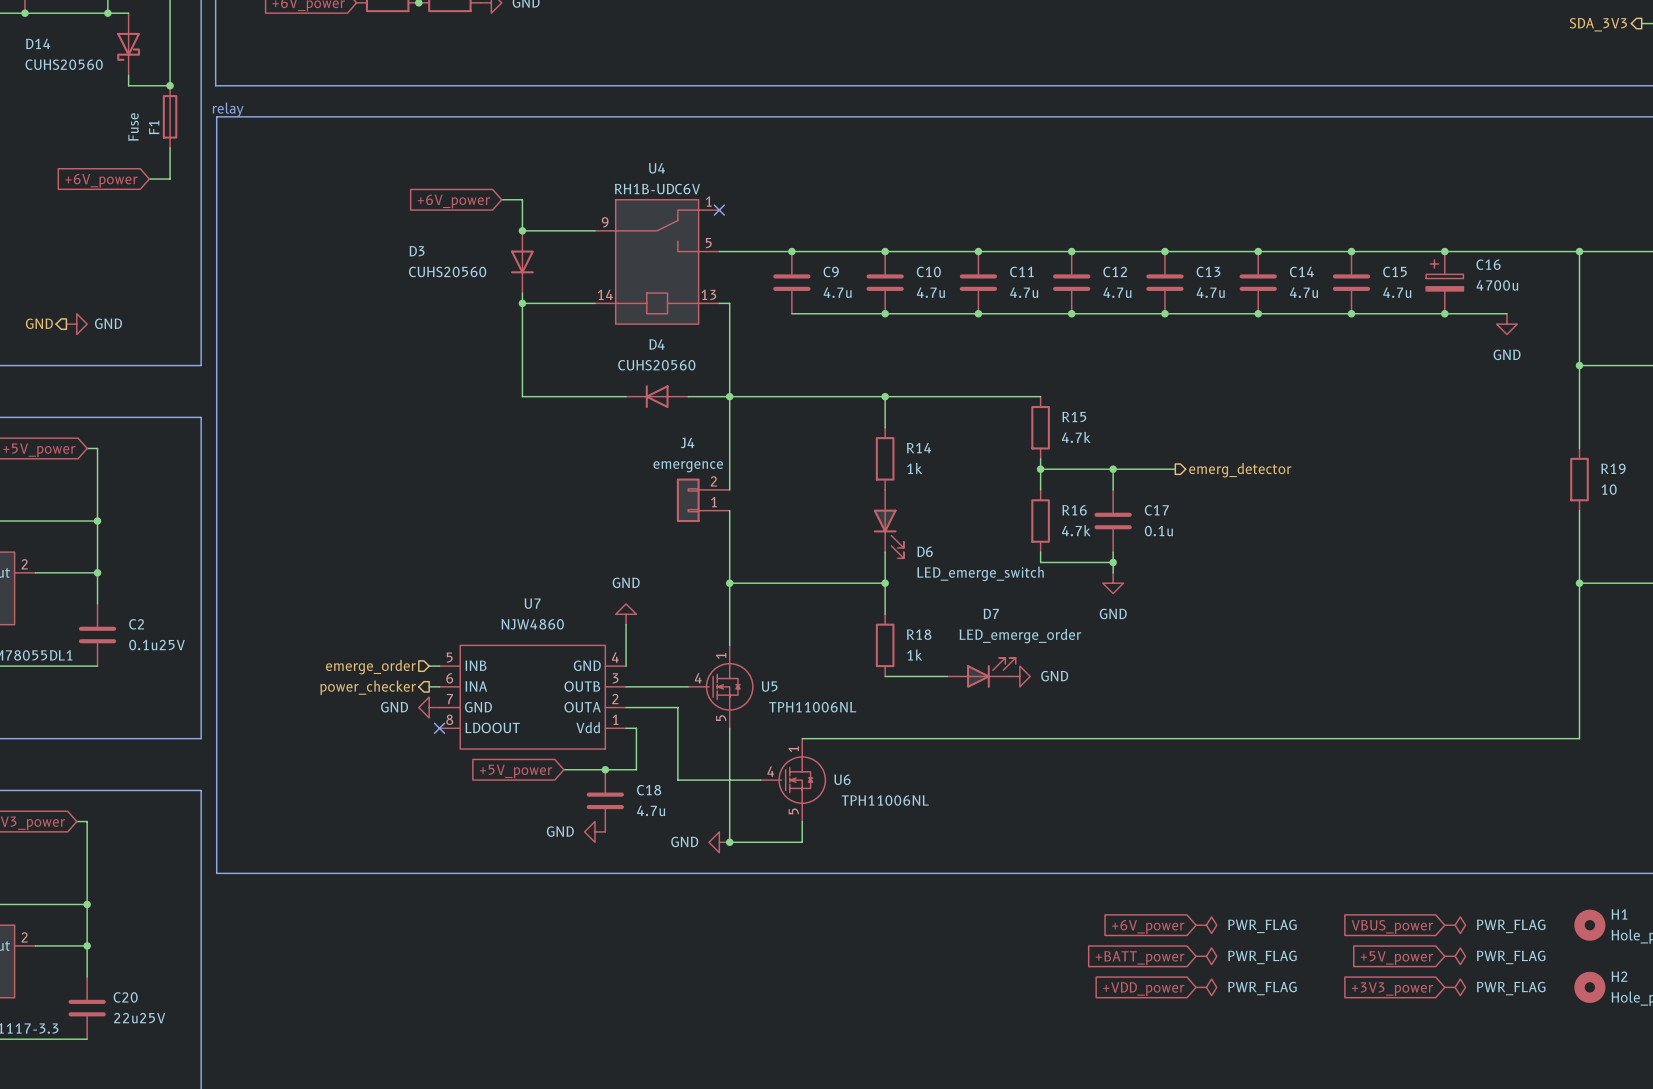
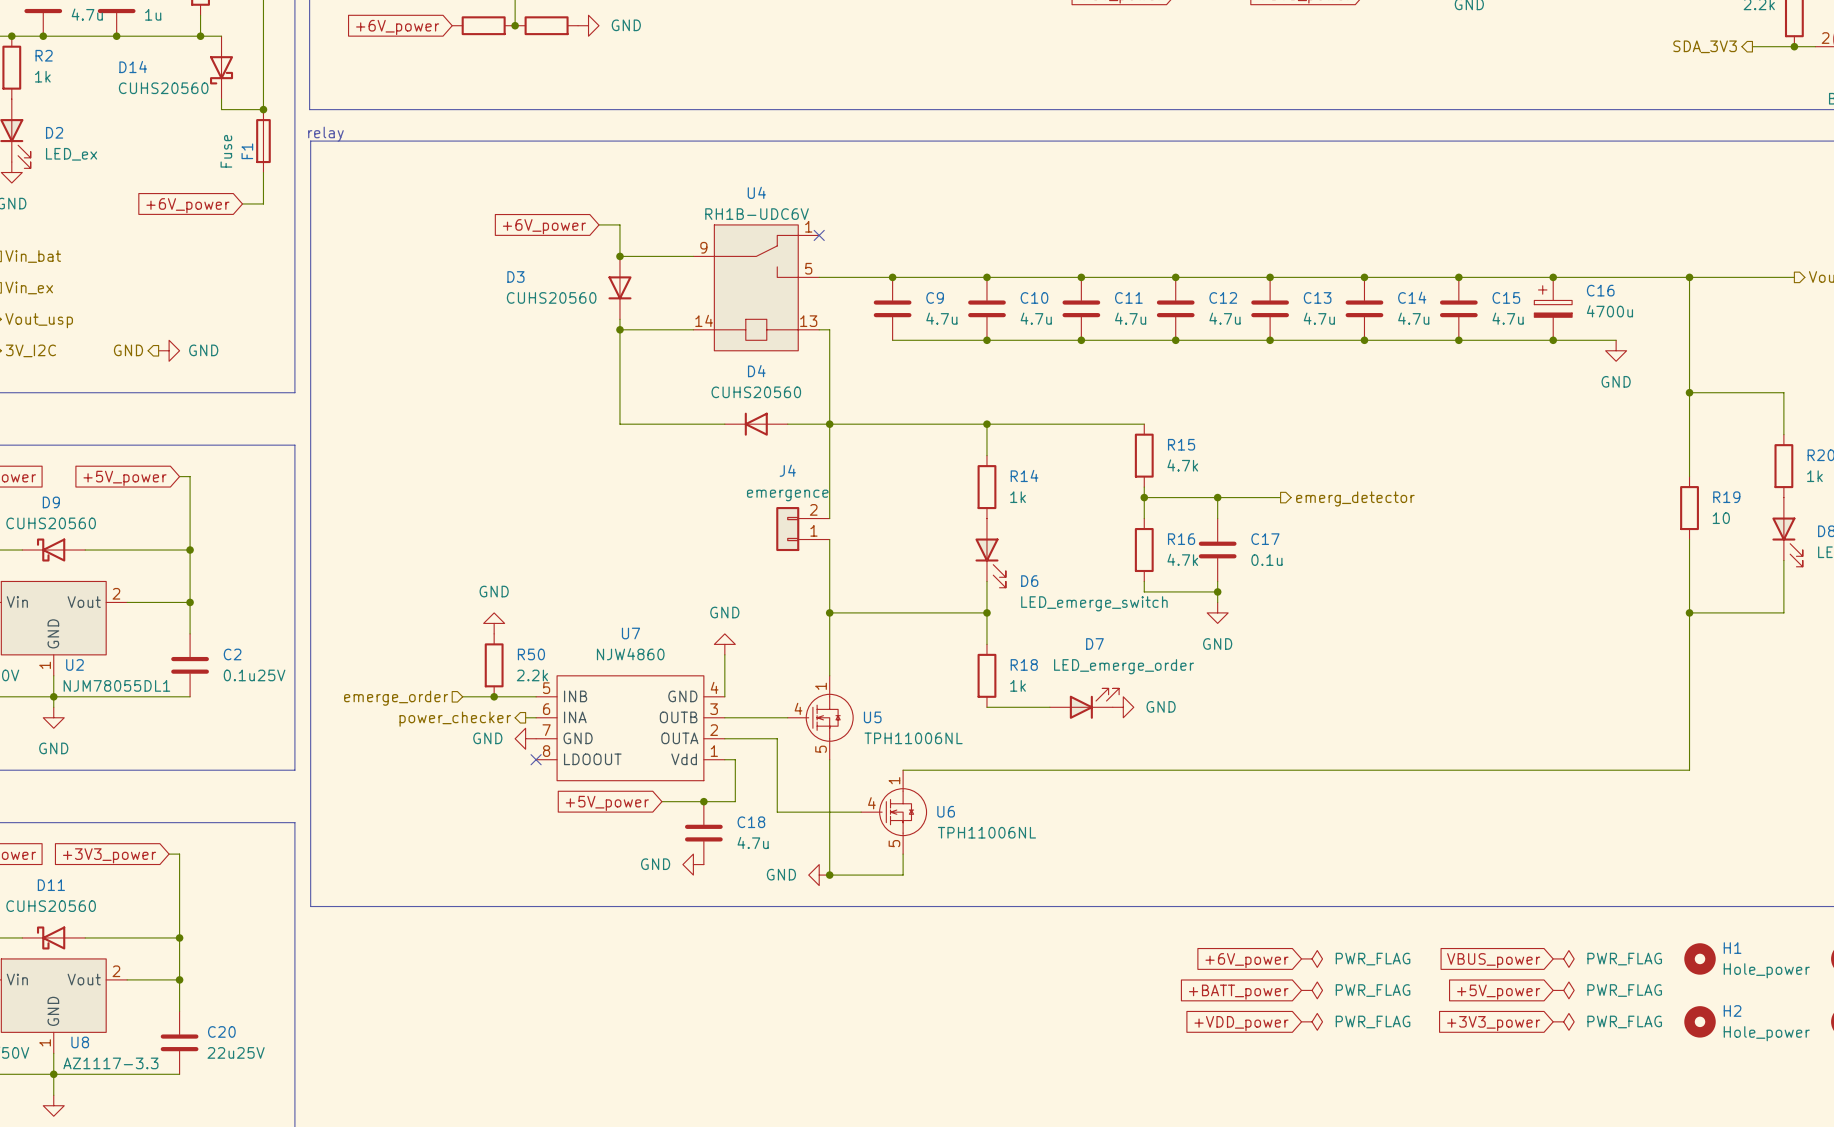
power symbol: none -> GND (494, 623)
R50: none -> 2.2k (494, 665)
wire: none -> (462, 696) (525, 696)
junction: none -> (494, 696)
hierarchical label position: emerge_order (370, 667) -> emerge_order (396, 698)

